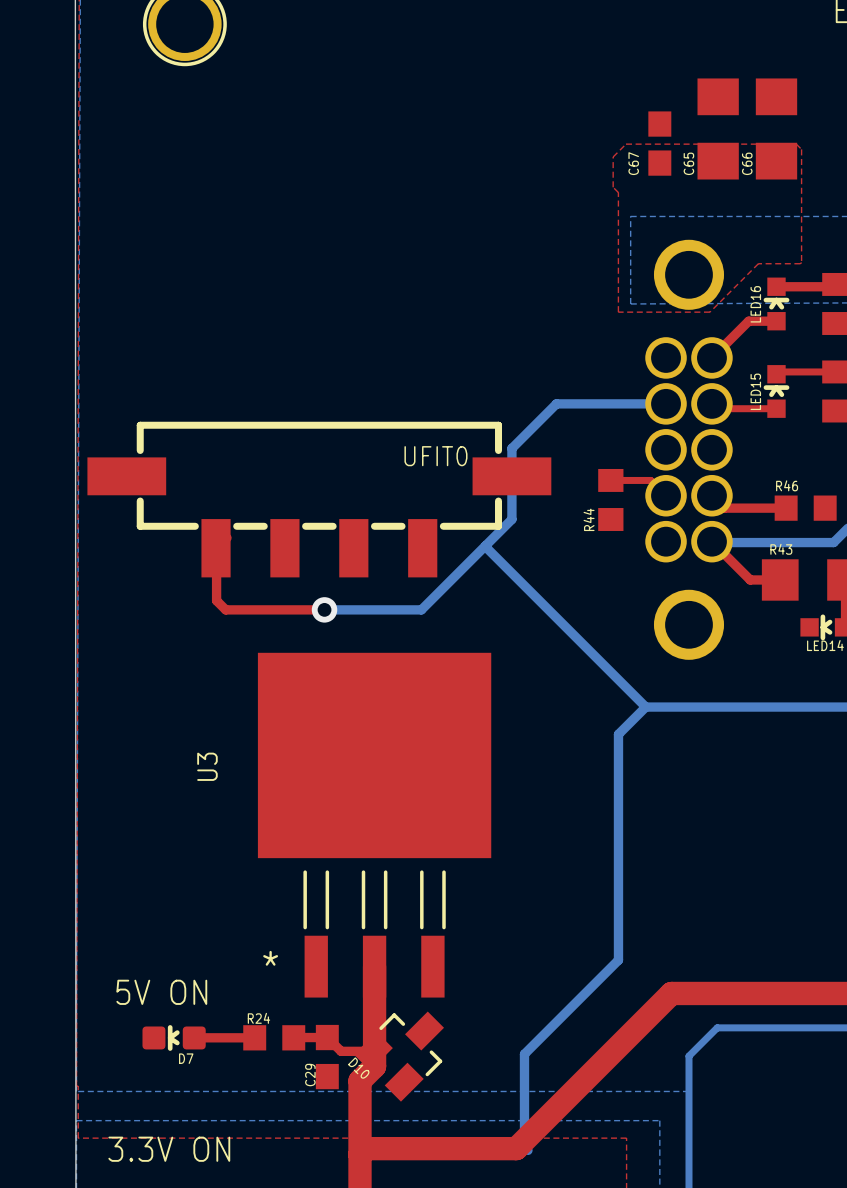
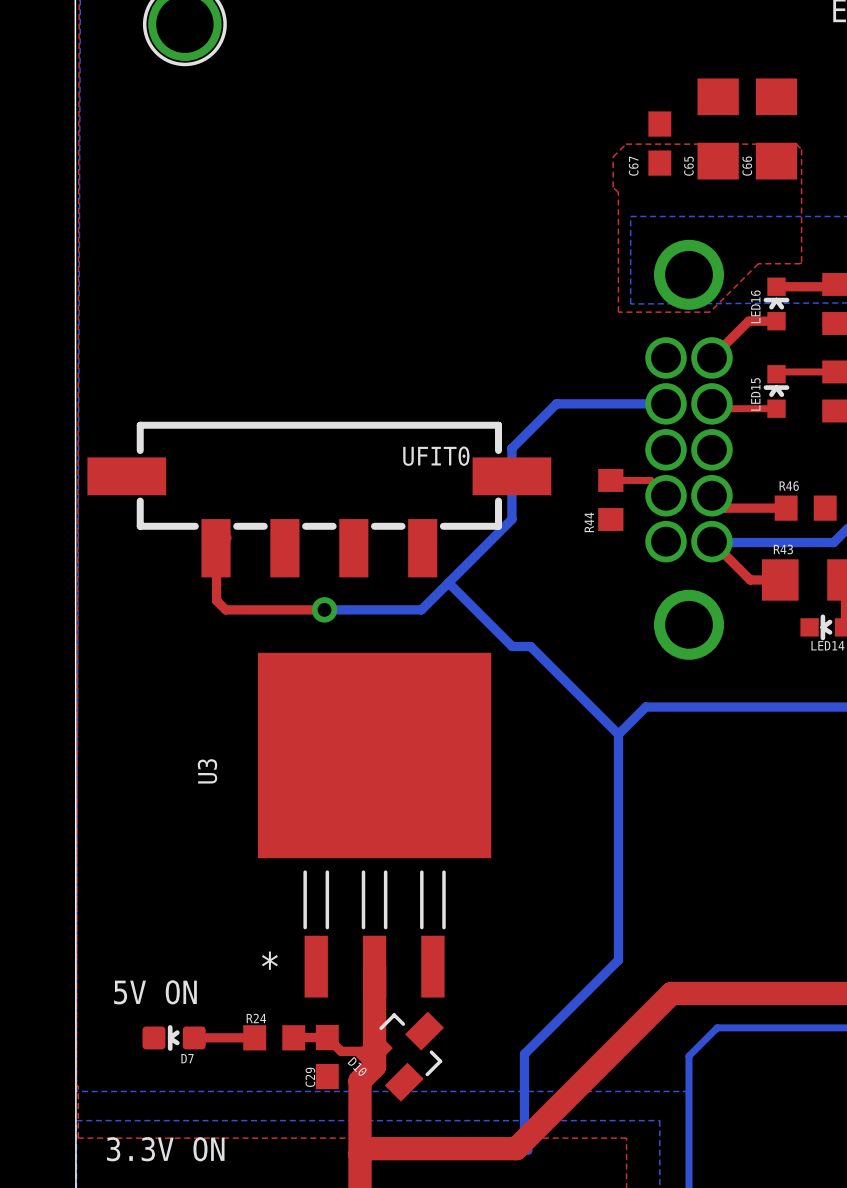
bottom track: (485, 545) (645, 707) -> none
bottom track: none -> (448, 582) (512, 646) (530, 646) (618, 734)

